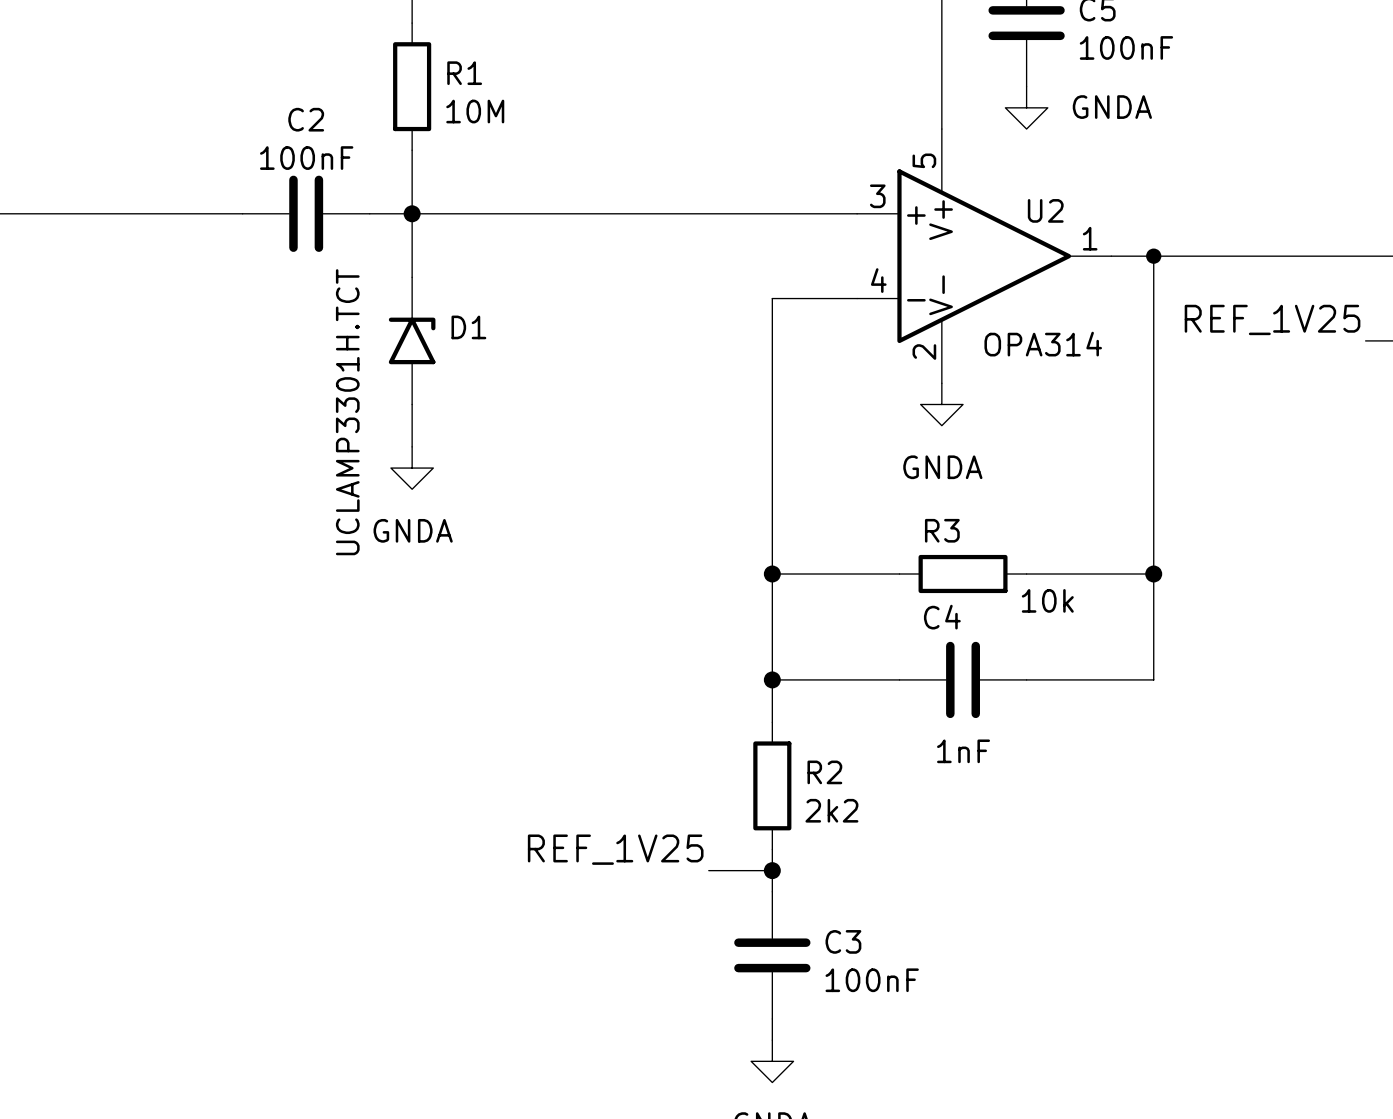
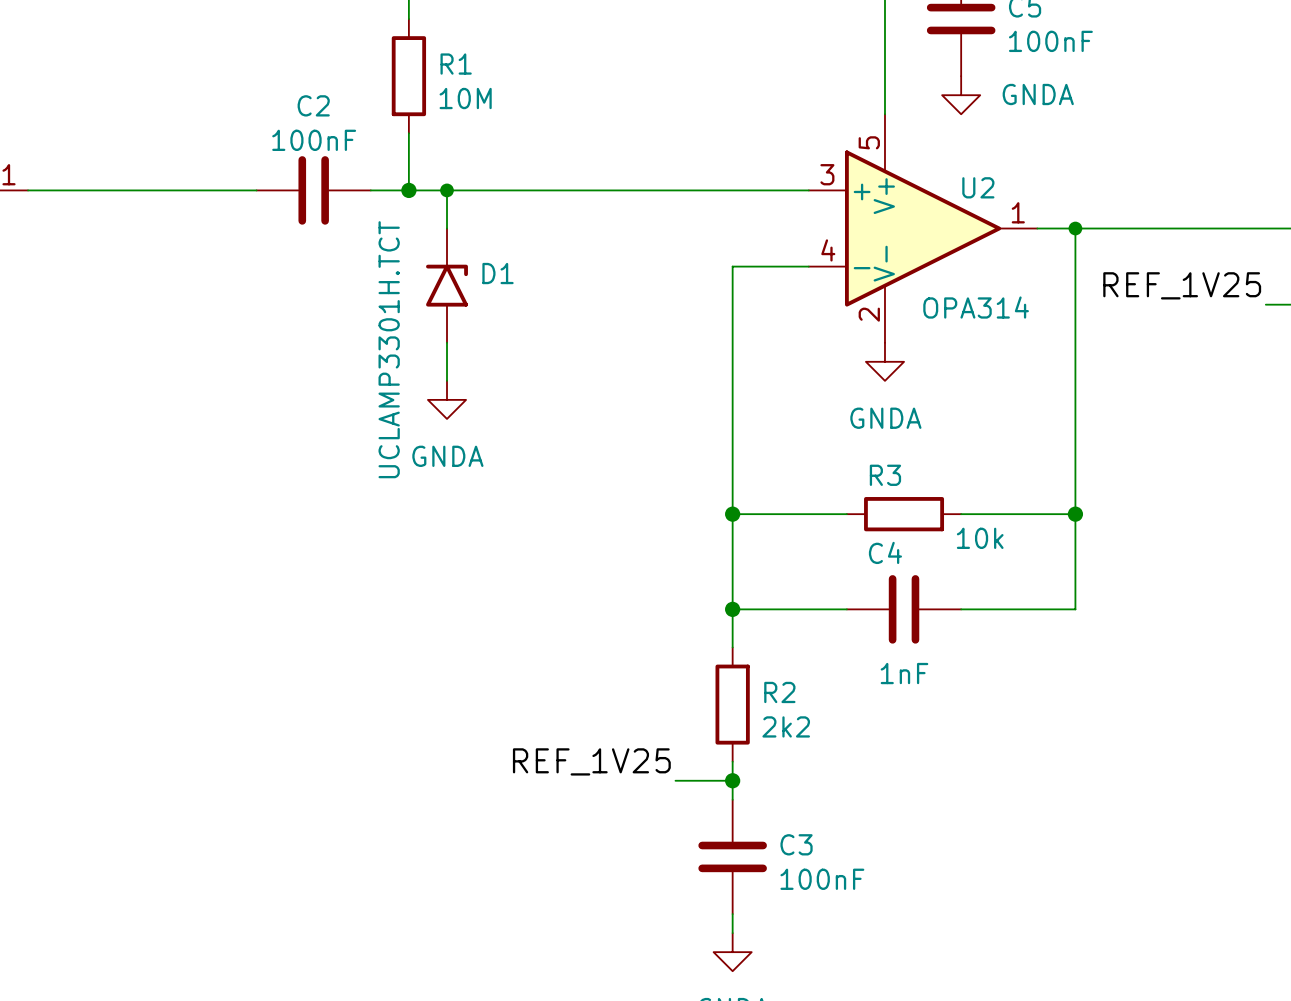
wire: (412, 213) (412, 277) -> none
wire: none -> (447, 190) (447, 228)
junction: none -> (447, 190)
D1 position: (412, 340) -> (447, 285)
wire: (412, 404) (412, 446) -> (447, 342) (447, 380)
power symbol position: GNDA (412, 468) -> GNDA (447, 399)

